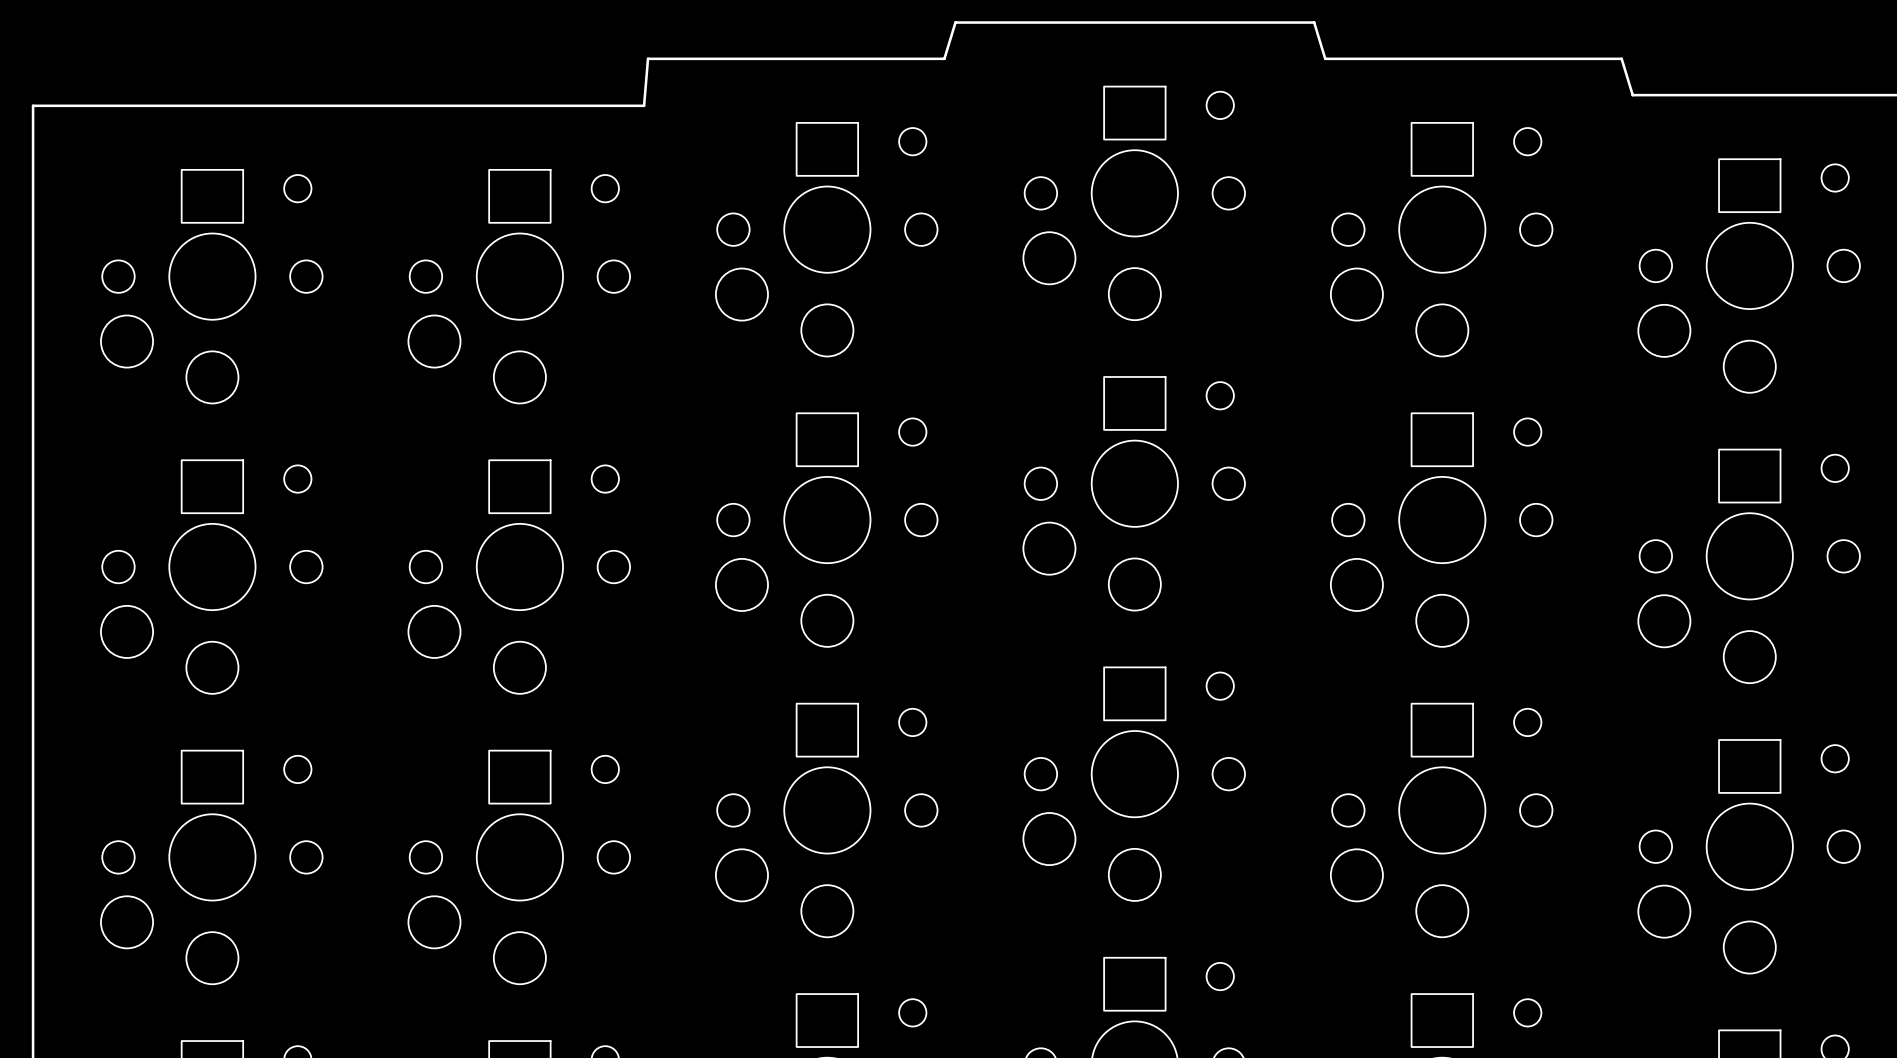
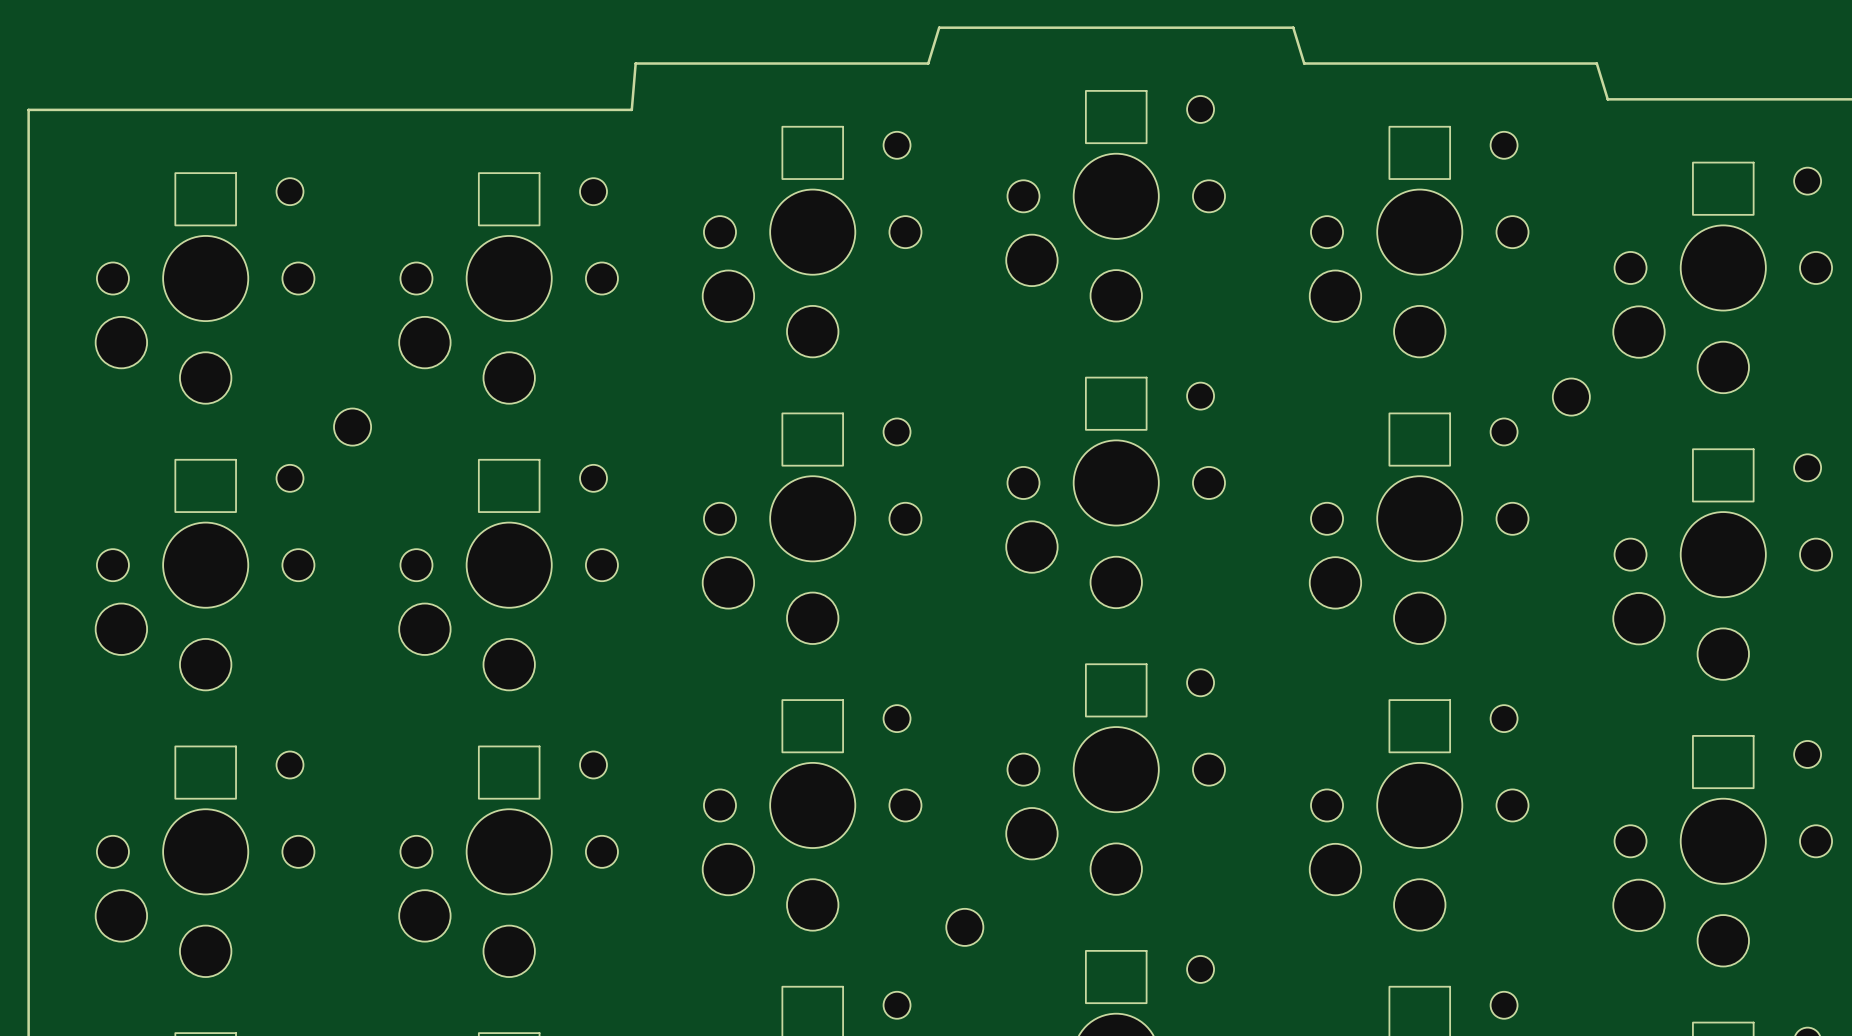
part: none -> (1571, 397)
part: none -> (352, 427)
part: none -> (964, 927)

